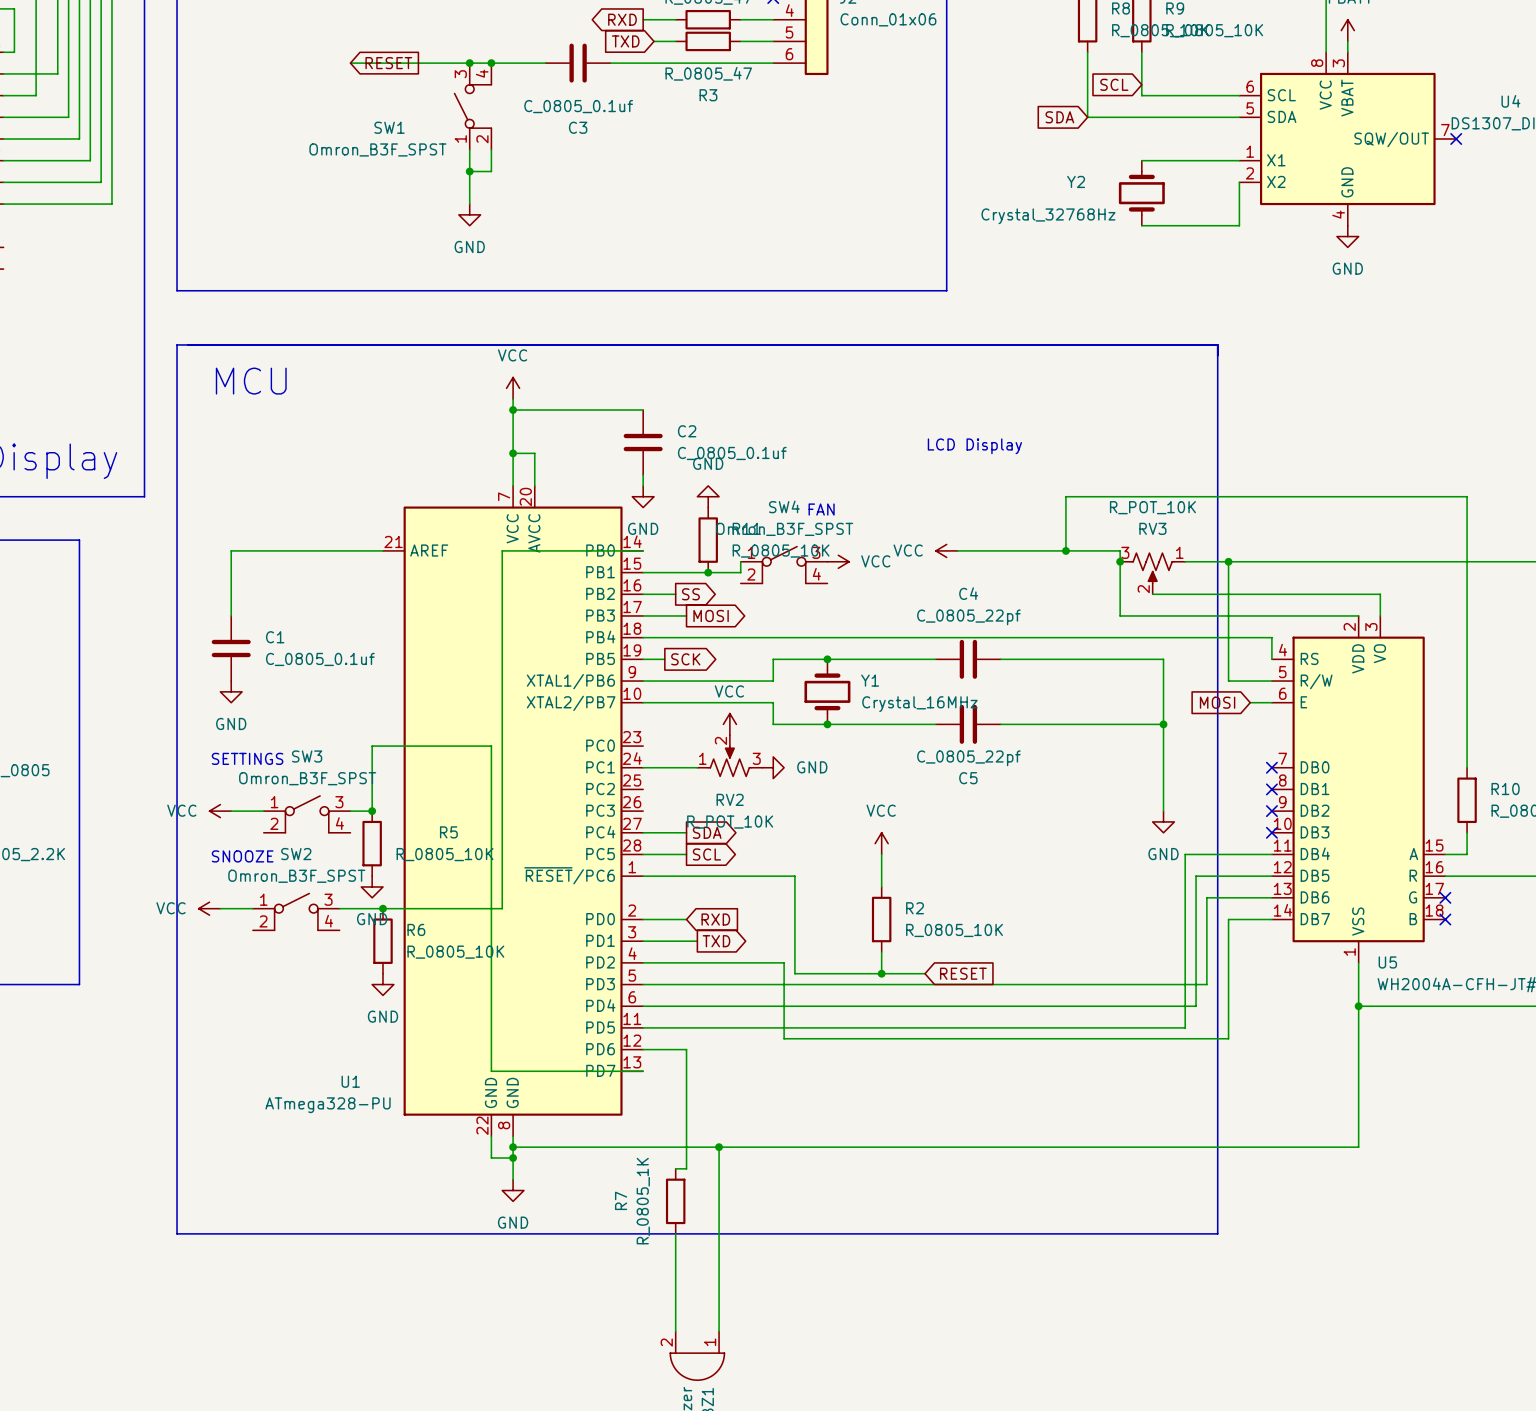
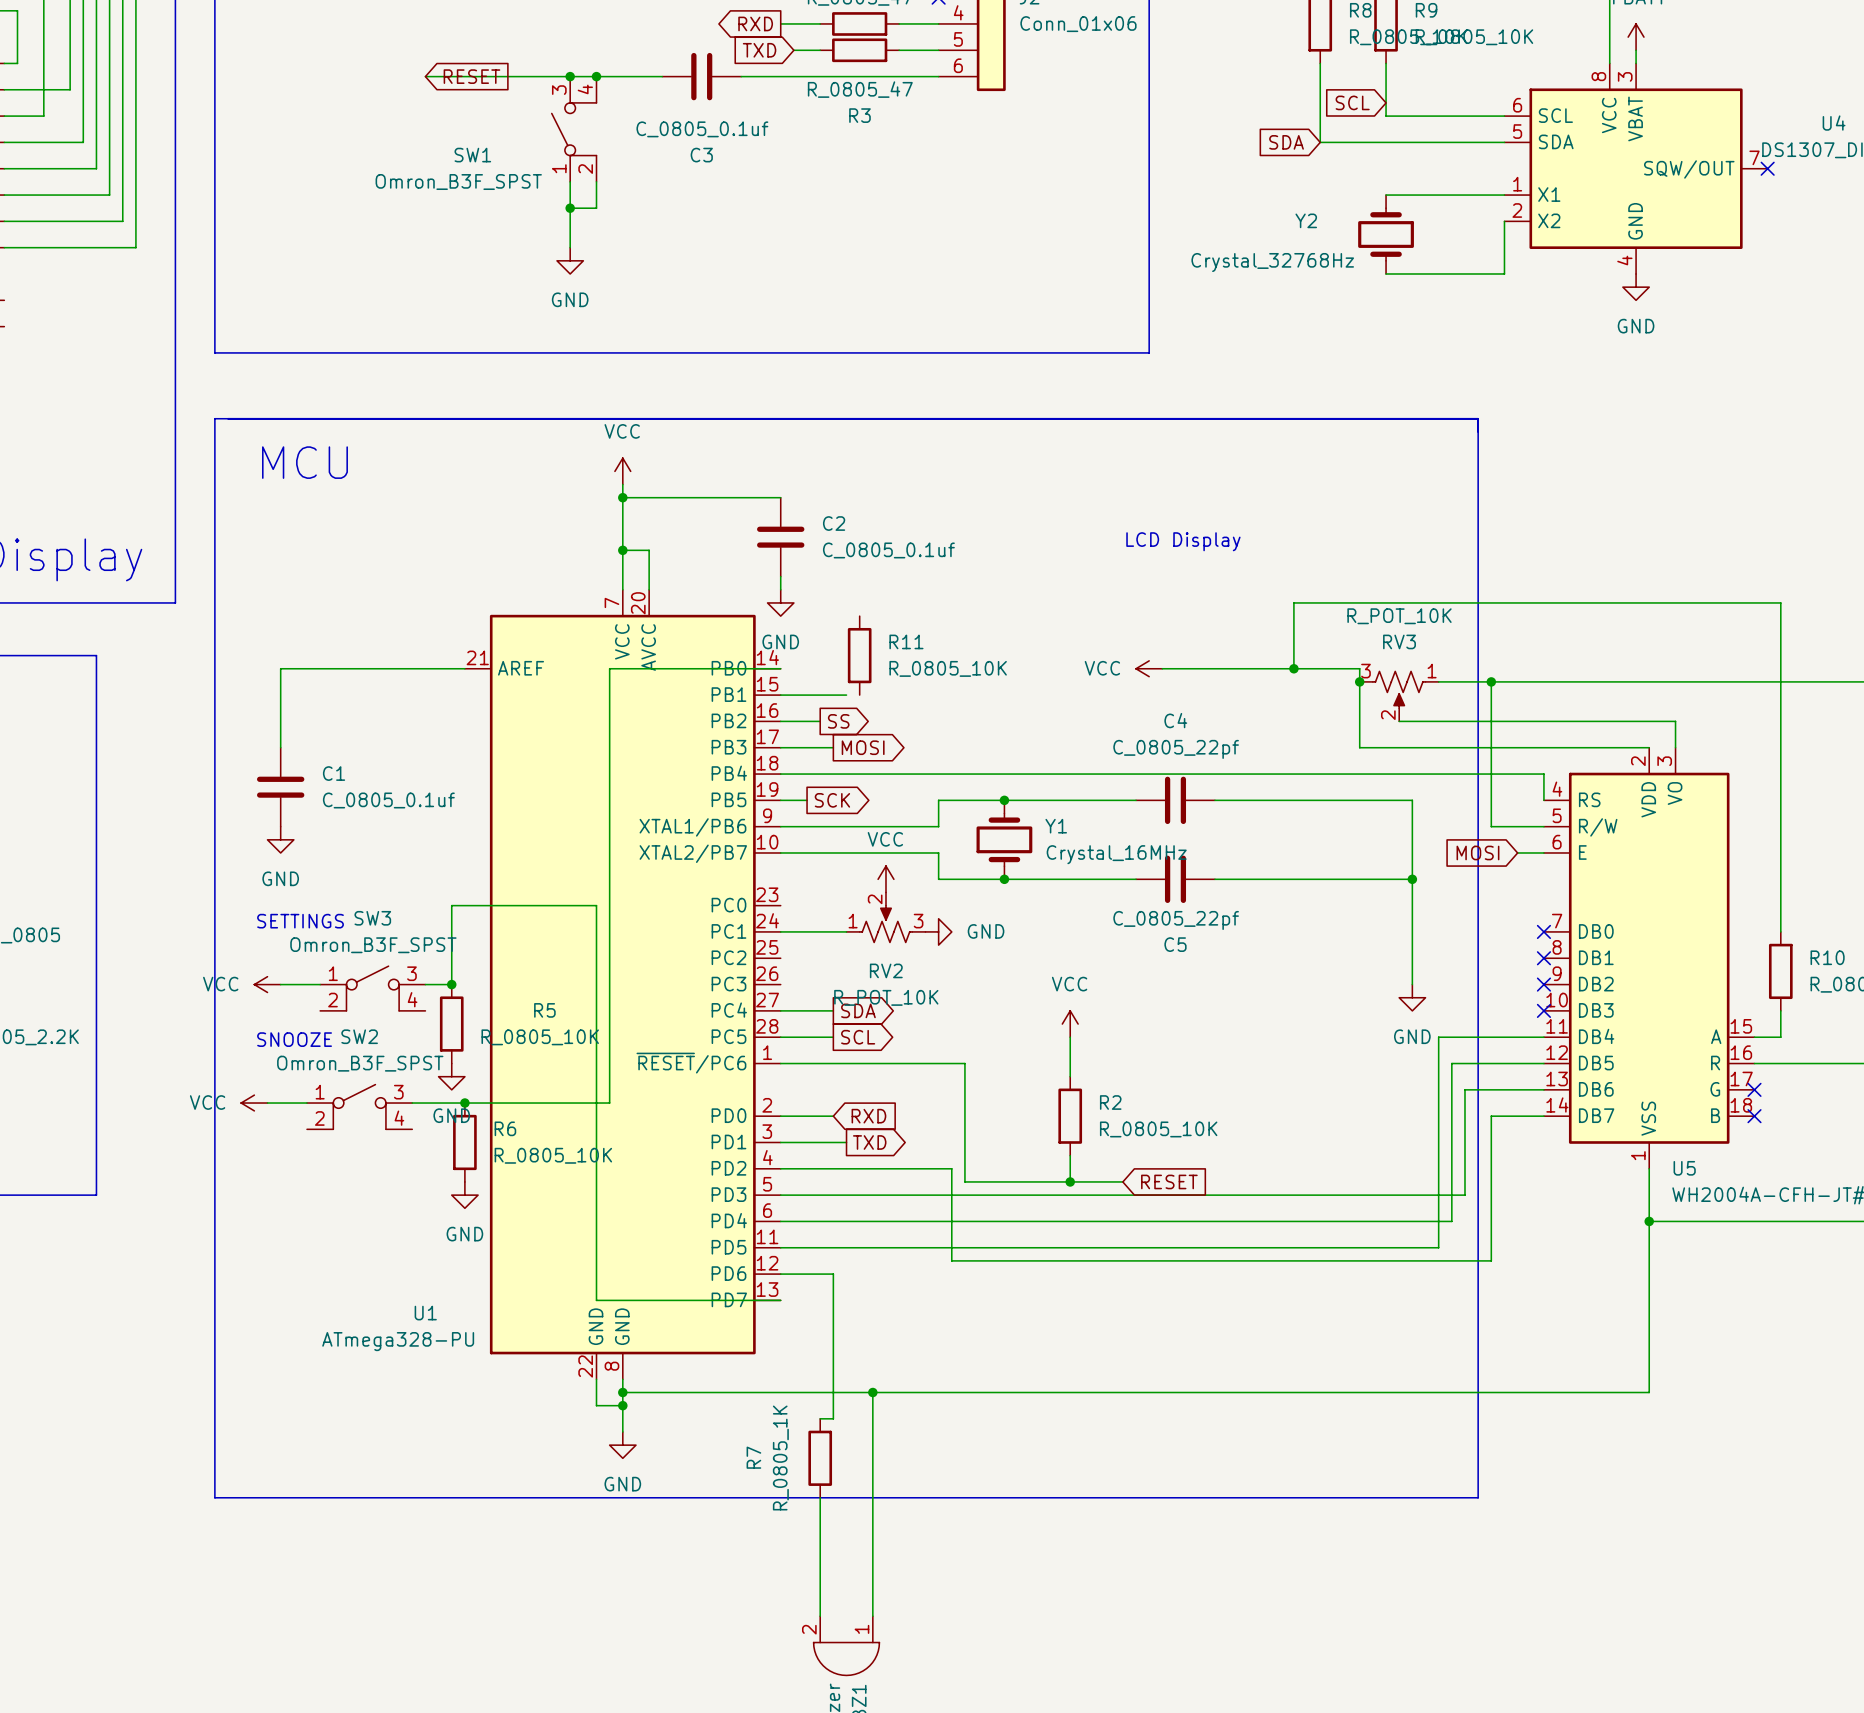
power symbol: GND (708, 496) -> none
text: FAN (821, 509) -> none
wire: (740, 561) (740, 572) (697, 572) -> none
power symbol: VCC (838, 561) -> none
SW4: Omron_B3F_SPST (784, 565) -> none
junction: (708, 572) -> none

